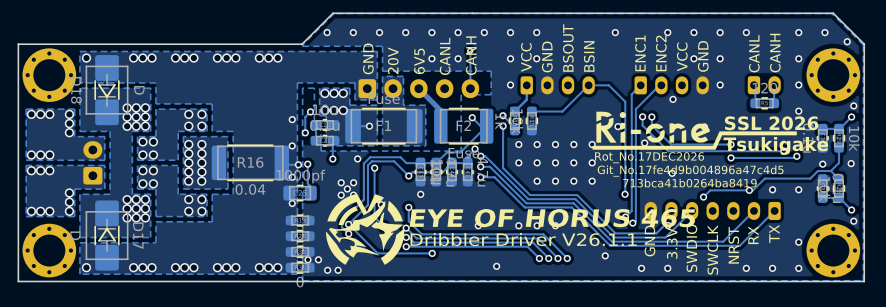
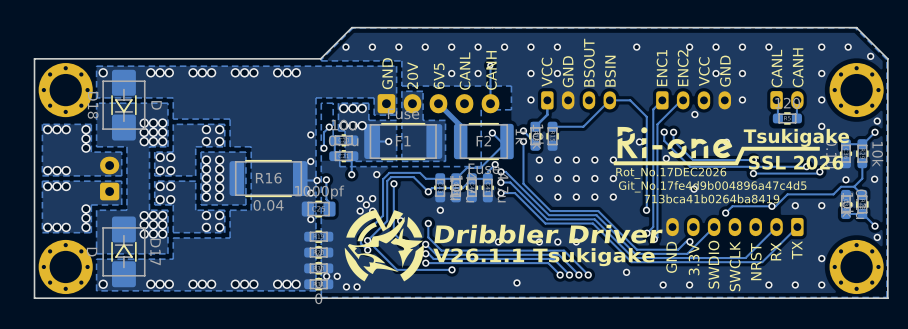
text: SSL 2026 (771, 123) -> Tsukigake (796, 137)
text: Tsukigake (775, 145) -> SSL 2026 (796, 162)
text: EYE OF HORUS 465 (552, 218) -> Dribbler Driver (548, 234)
text: Dribbler Driver V26.1.1 (523, 239) -> V26.1.1 Tsukigake (544, 257)

